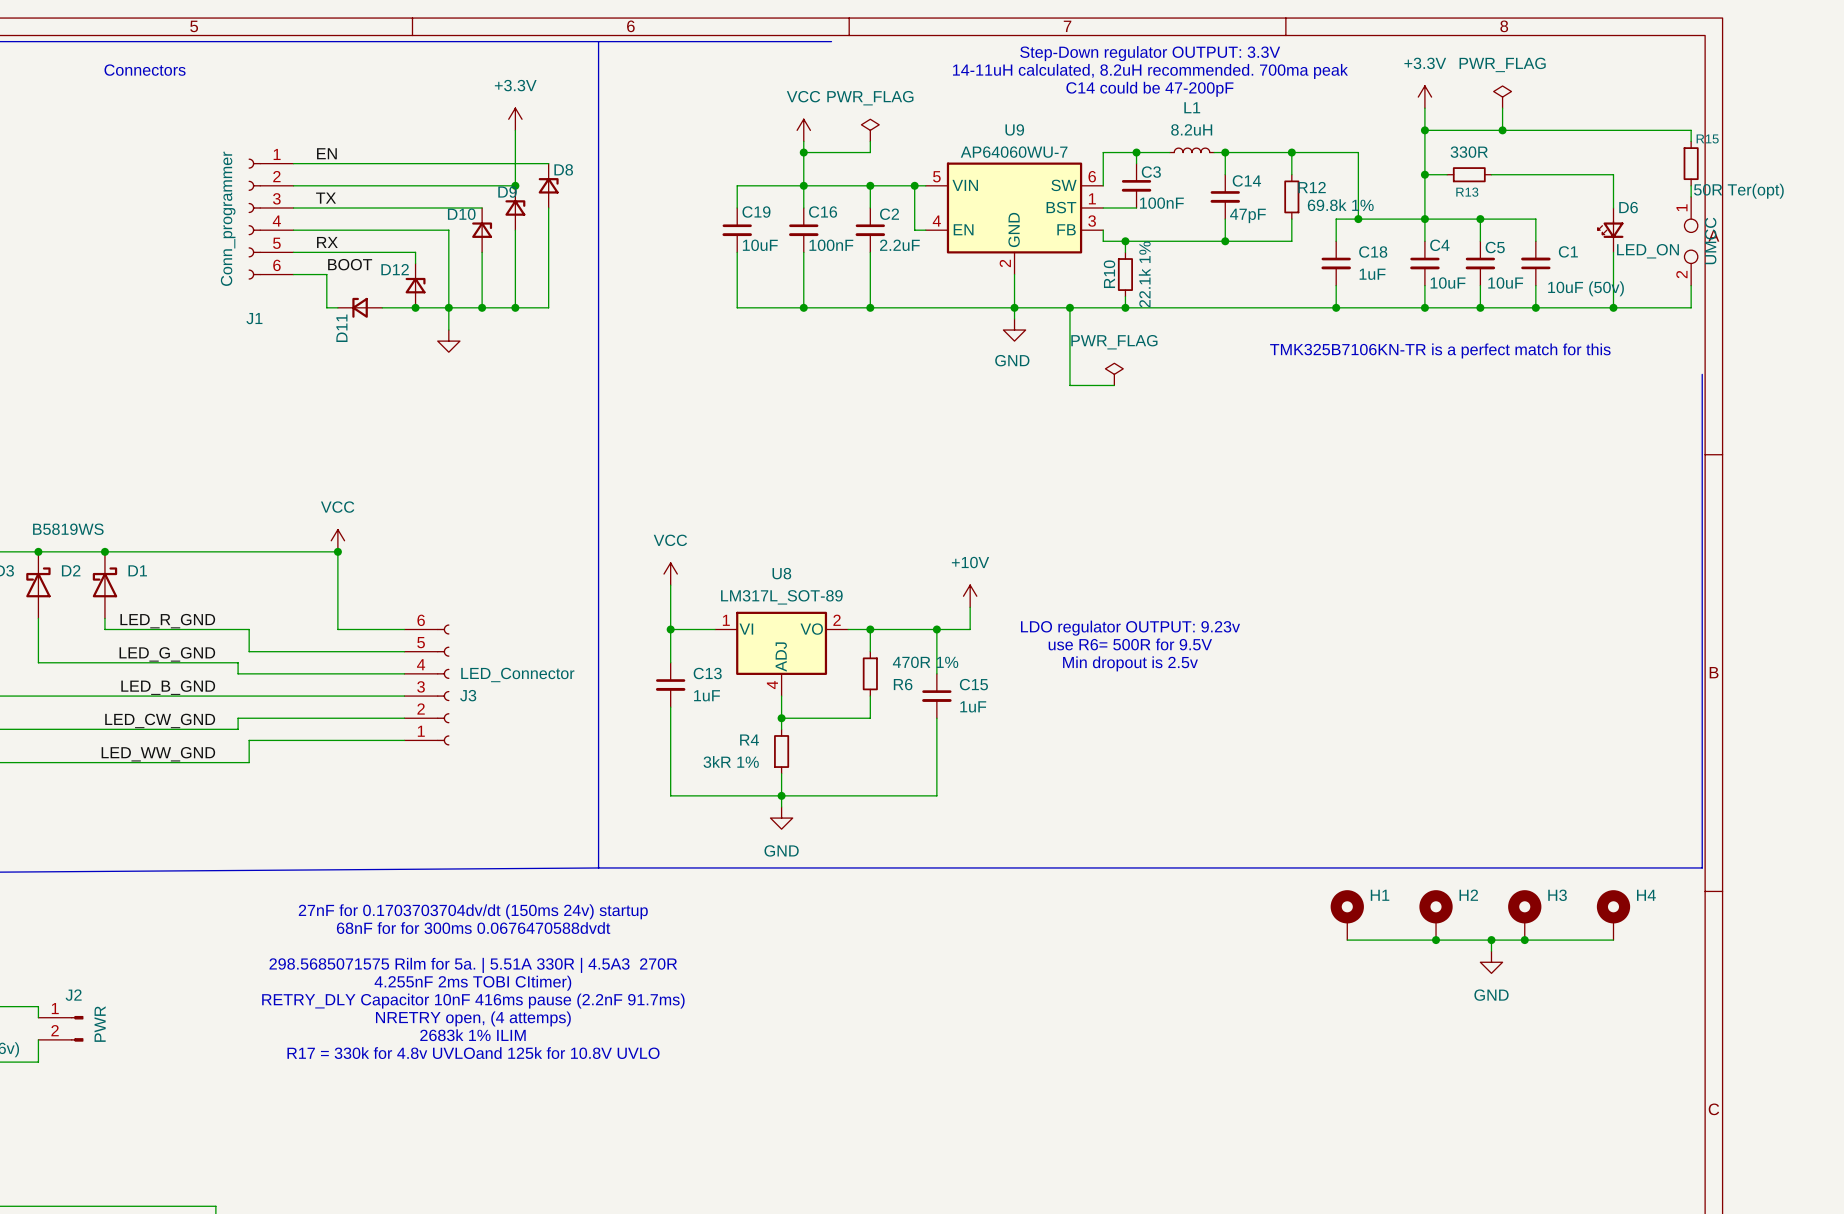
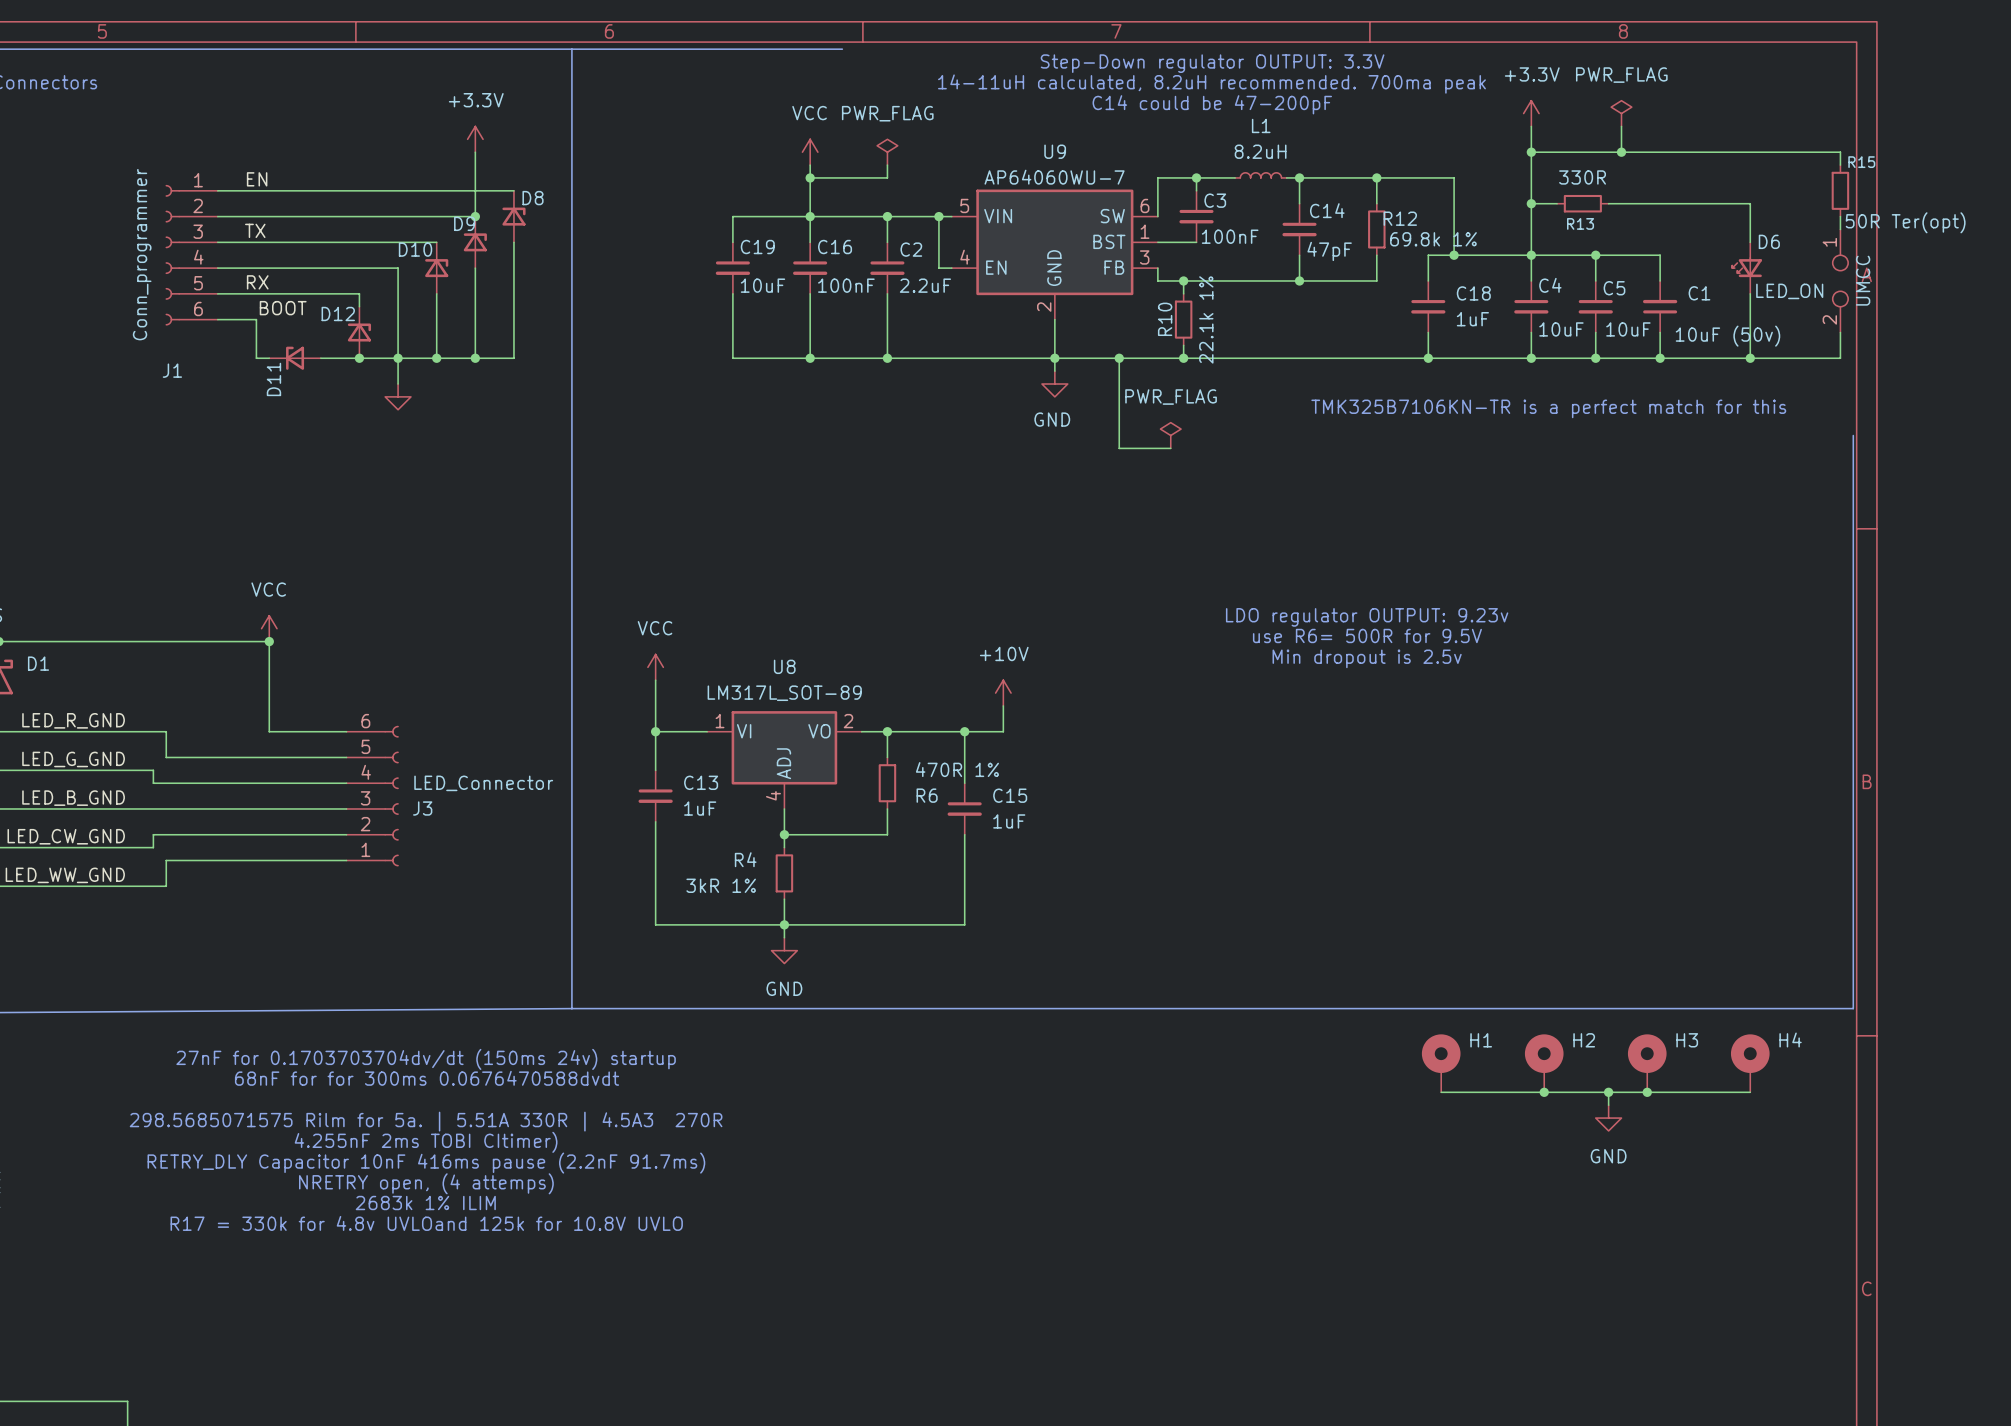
text position: LDO regulator OUTPUT: 9.23v (1130, 628) -> LDO regulator OUTPUT: 9.23v (1367, 617)
text position: use R6= 500R for 9.5V (1130, 644) -> use R6= 500R for 9.5V (1367, 635)
text position: Min dropout is 2.5v (1130, 663) -> Min dropout is 2.5v (1367, 658)

